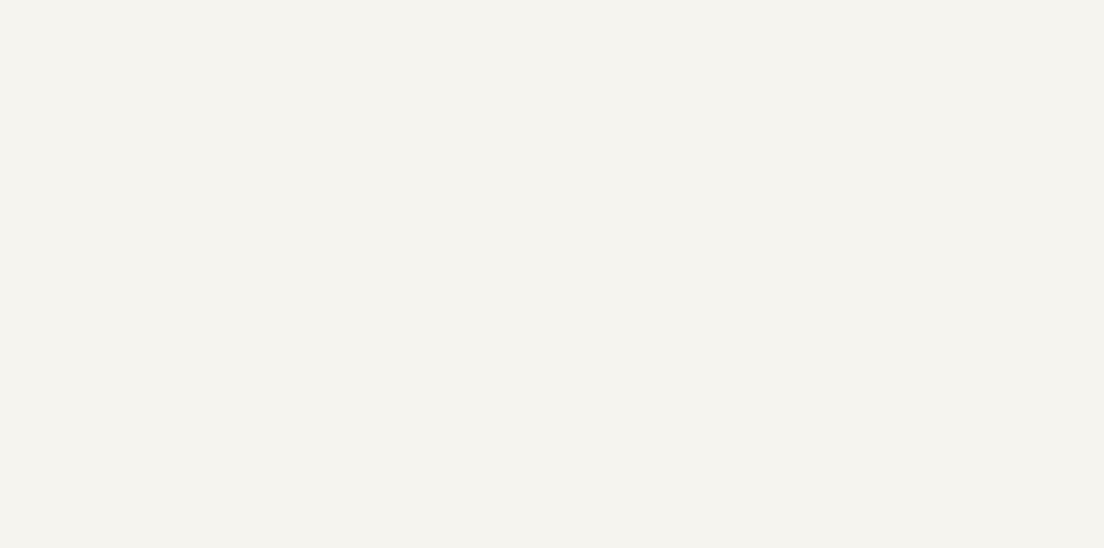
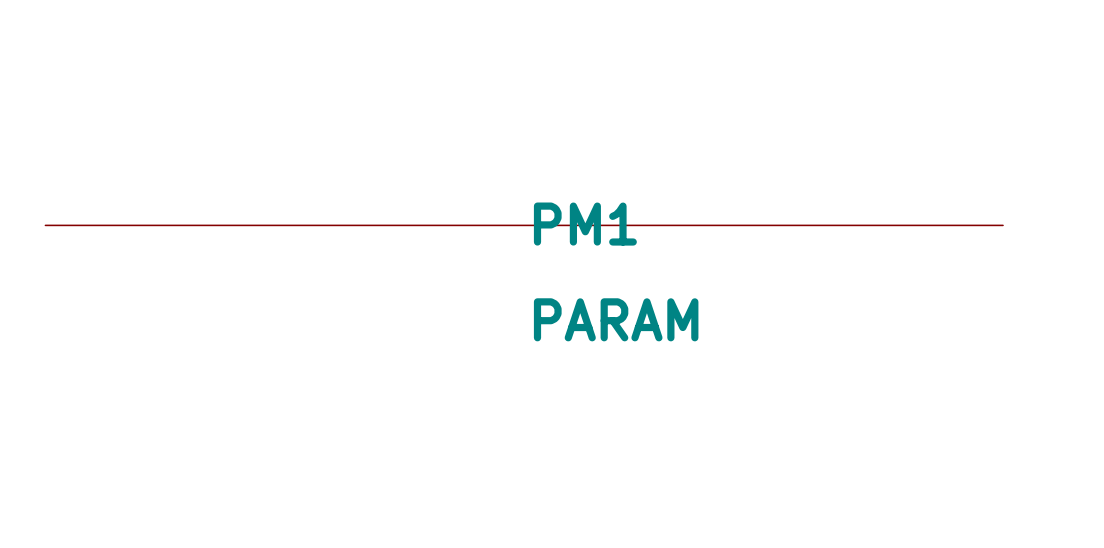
PM1: none -> PARAM (524, 225)

